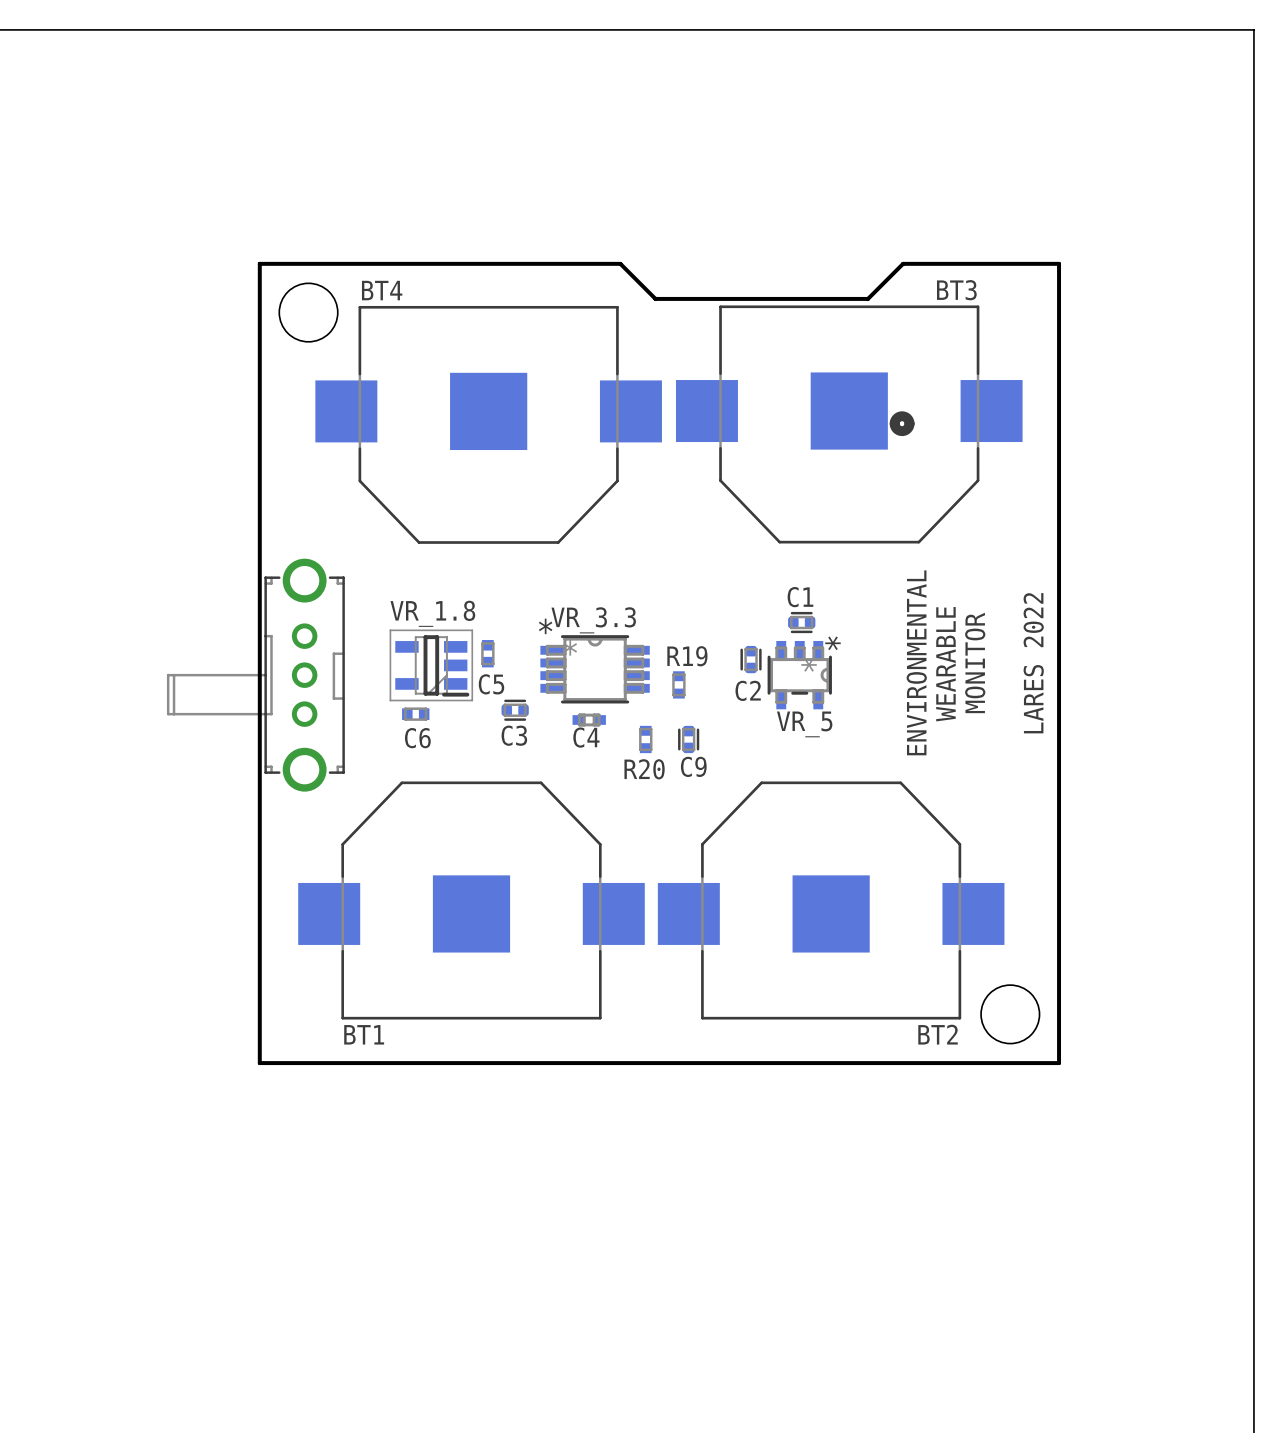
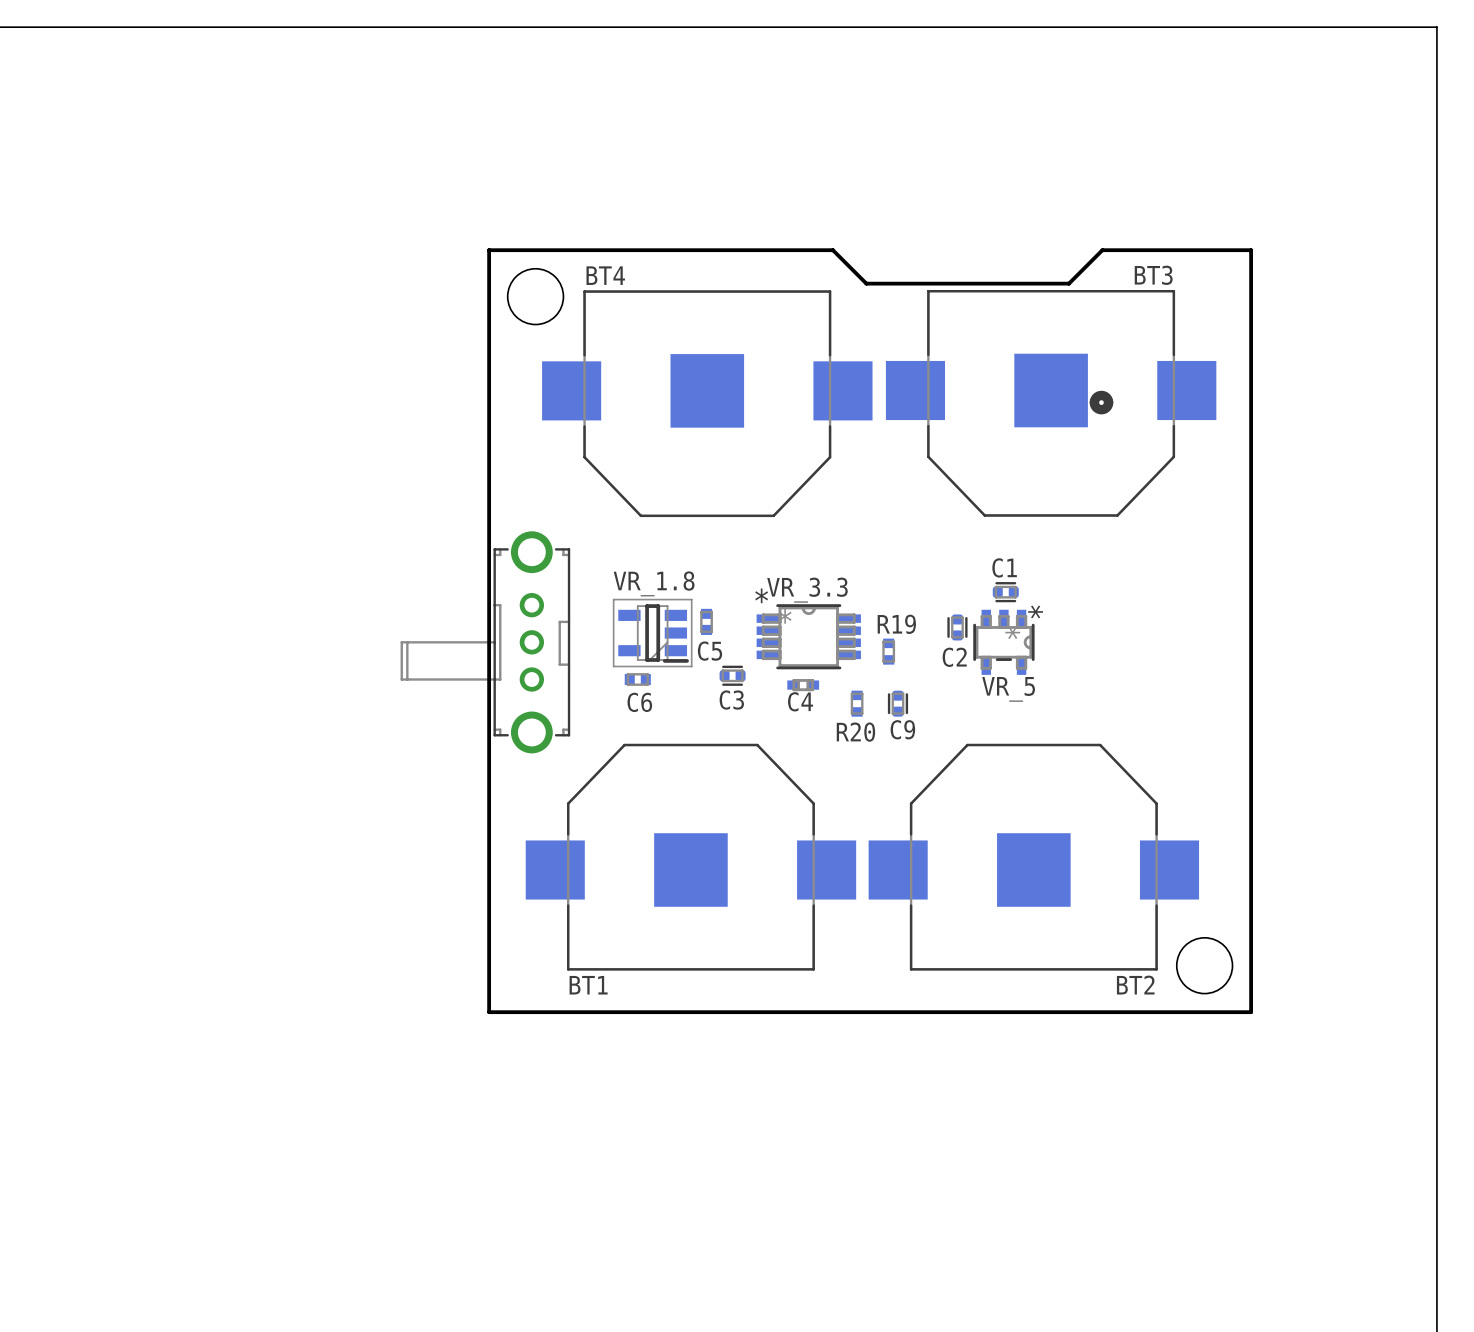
text: ENVIRONMENTAL (916, 662) -> none
text: MONITOR (975, 662) -> none
text: LARES 2022 (1033, 663) -> none
text: WEARABLE (945, 664) -> none

